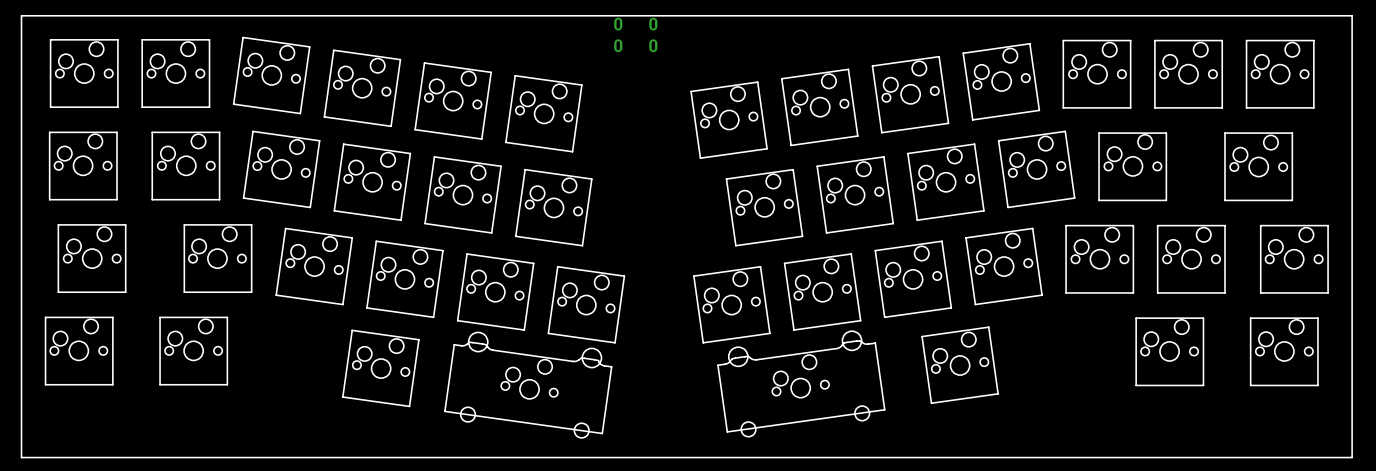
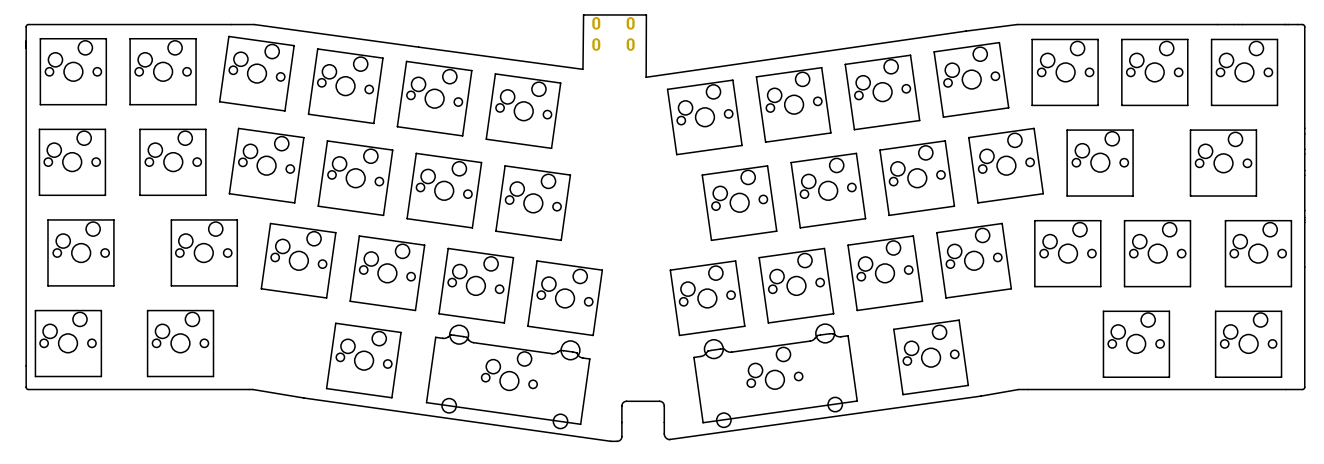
board edge: (21, 15) (1352, 15) (1352, 457) (21, 457) (21, 15) -> none
board edge: none -> (582, 69) (254, 24) (27, 24) (26, 388) (252, 389) (617, 441) (621, 437) (621, 405) (625, 401) (662, 402) (664, 434) (669, 439) (1018, 389) (1304, 388) (1303, 24) (1017, 24) (646, 77) (646, 14) (583, 14) (582, 69)

